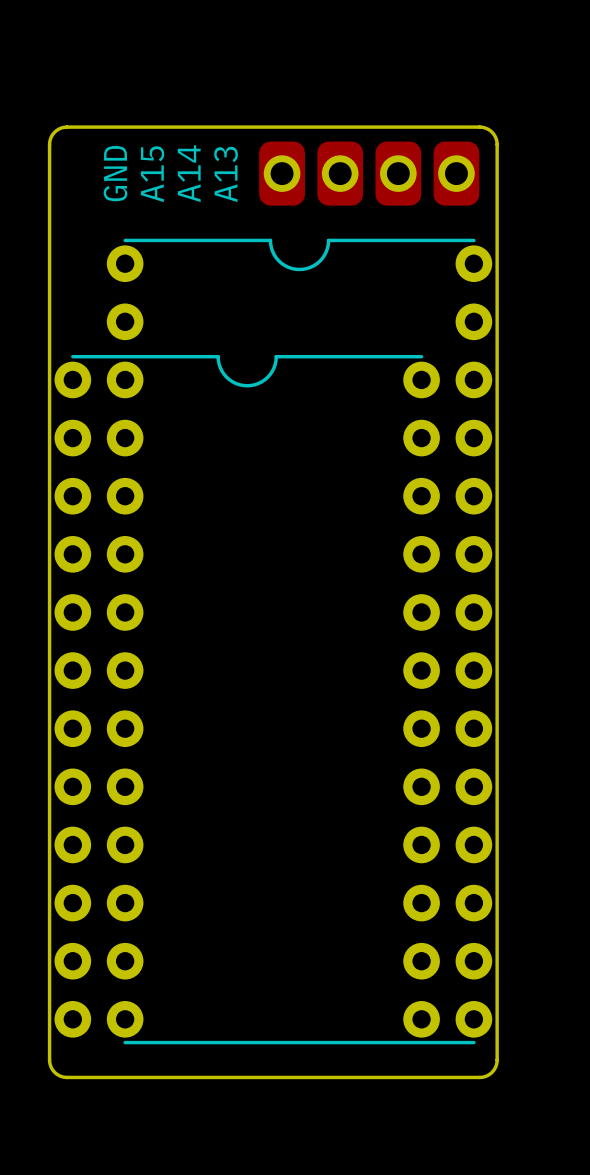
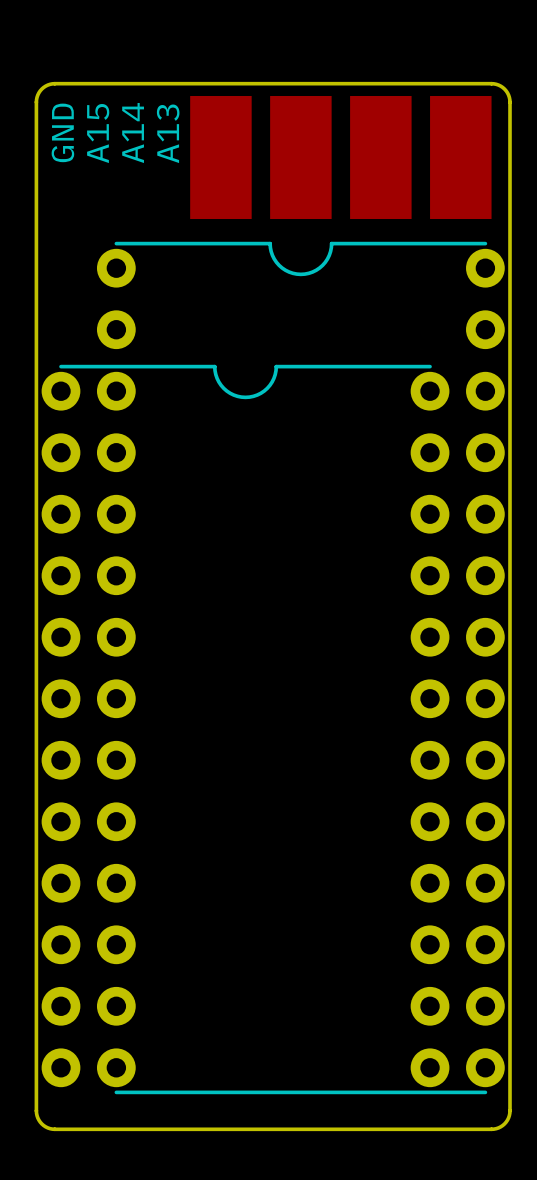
board edge: (49, 144) (54, 132) (67, 127) (479, 127) (492, 132) (497, 144) -> (36, 142) (37, 97) (43, 87) (54, 83) (493, 83) (504, 89) (509, 97) (509, 142)
part: none -> (340, 157)
text position: GND (115, 173) -> GND (62, 132)
text position: A14 (189, 173) -> A14 (133, 133)
part: (369, 173) -> none
text position: A15 (152, 174) -> A15 (98, 133)
text position: A13 (226, 174) -> A13 (168, 133)

